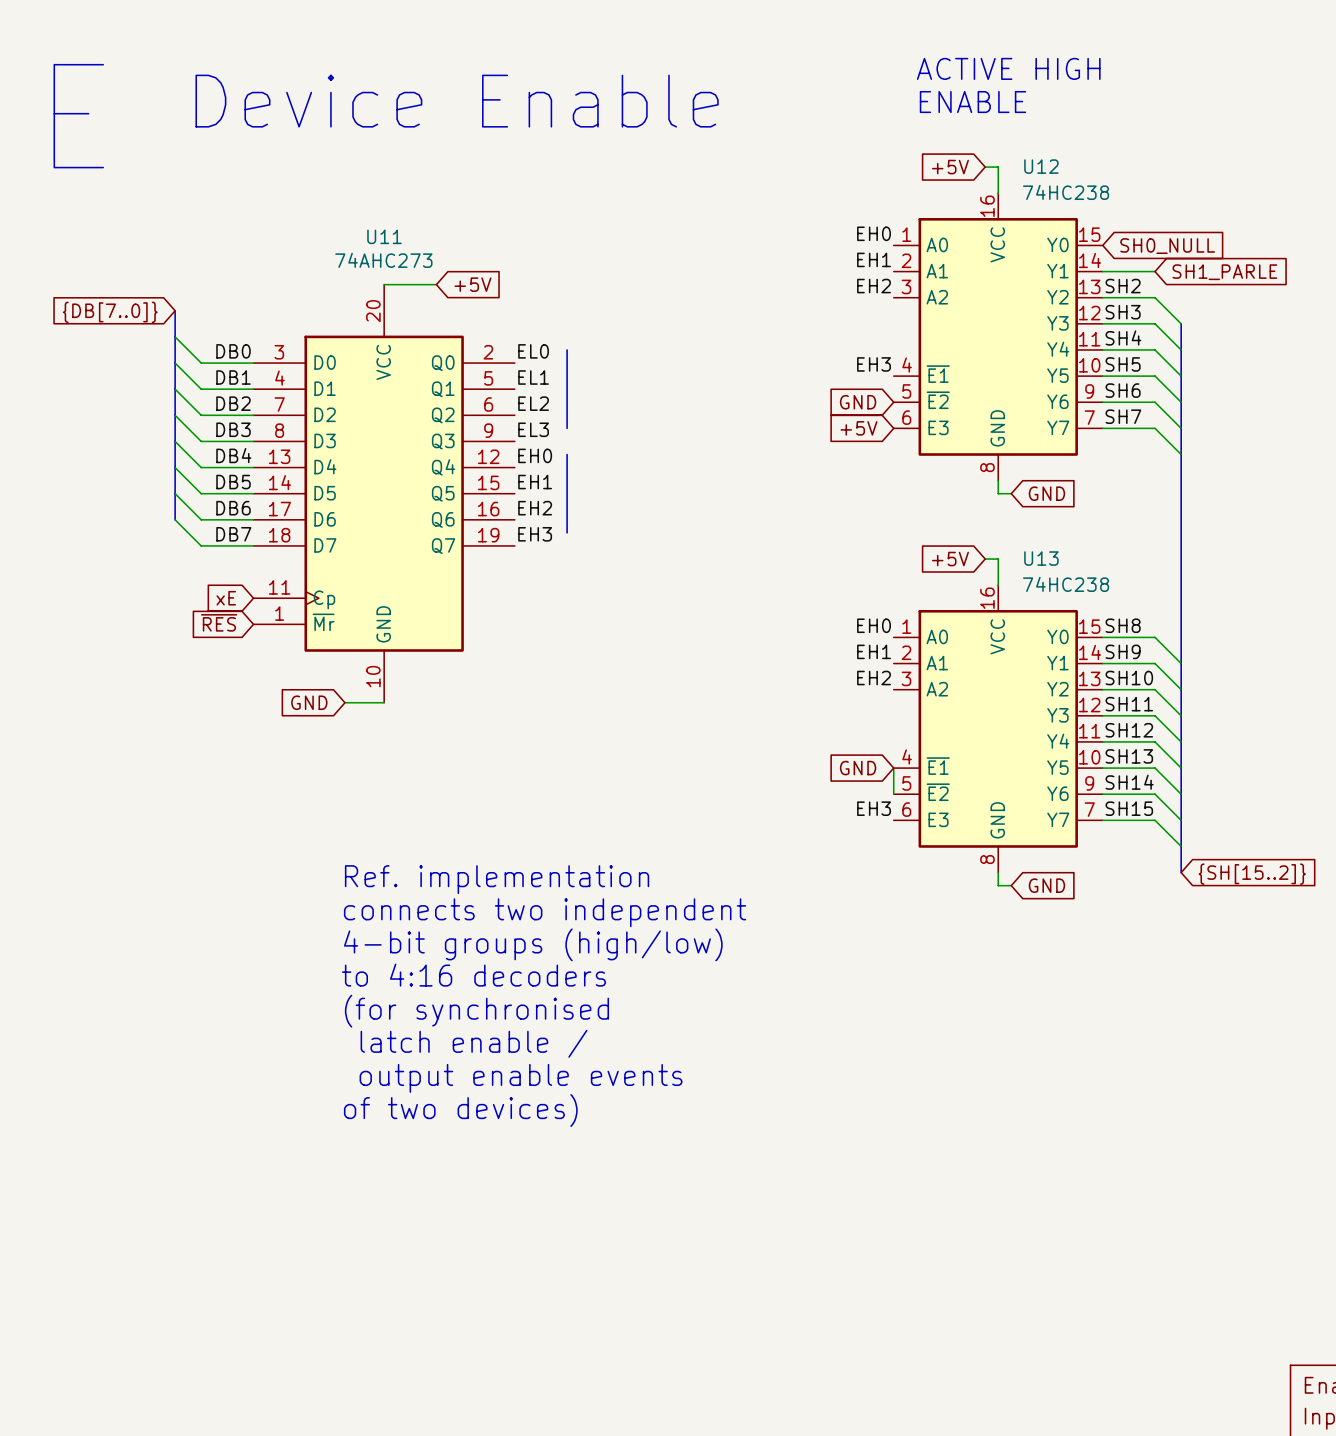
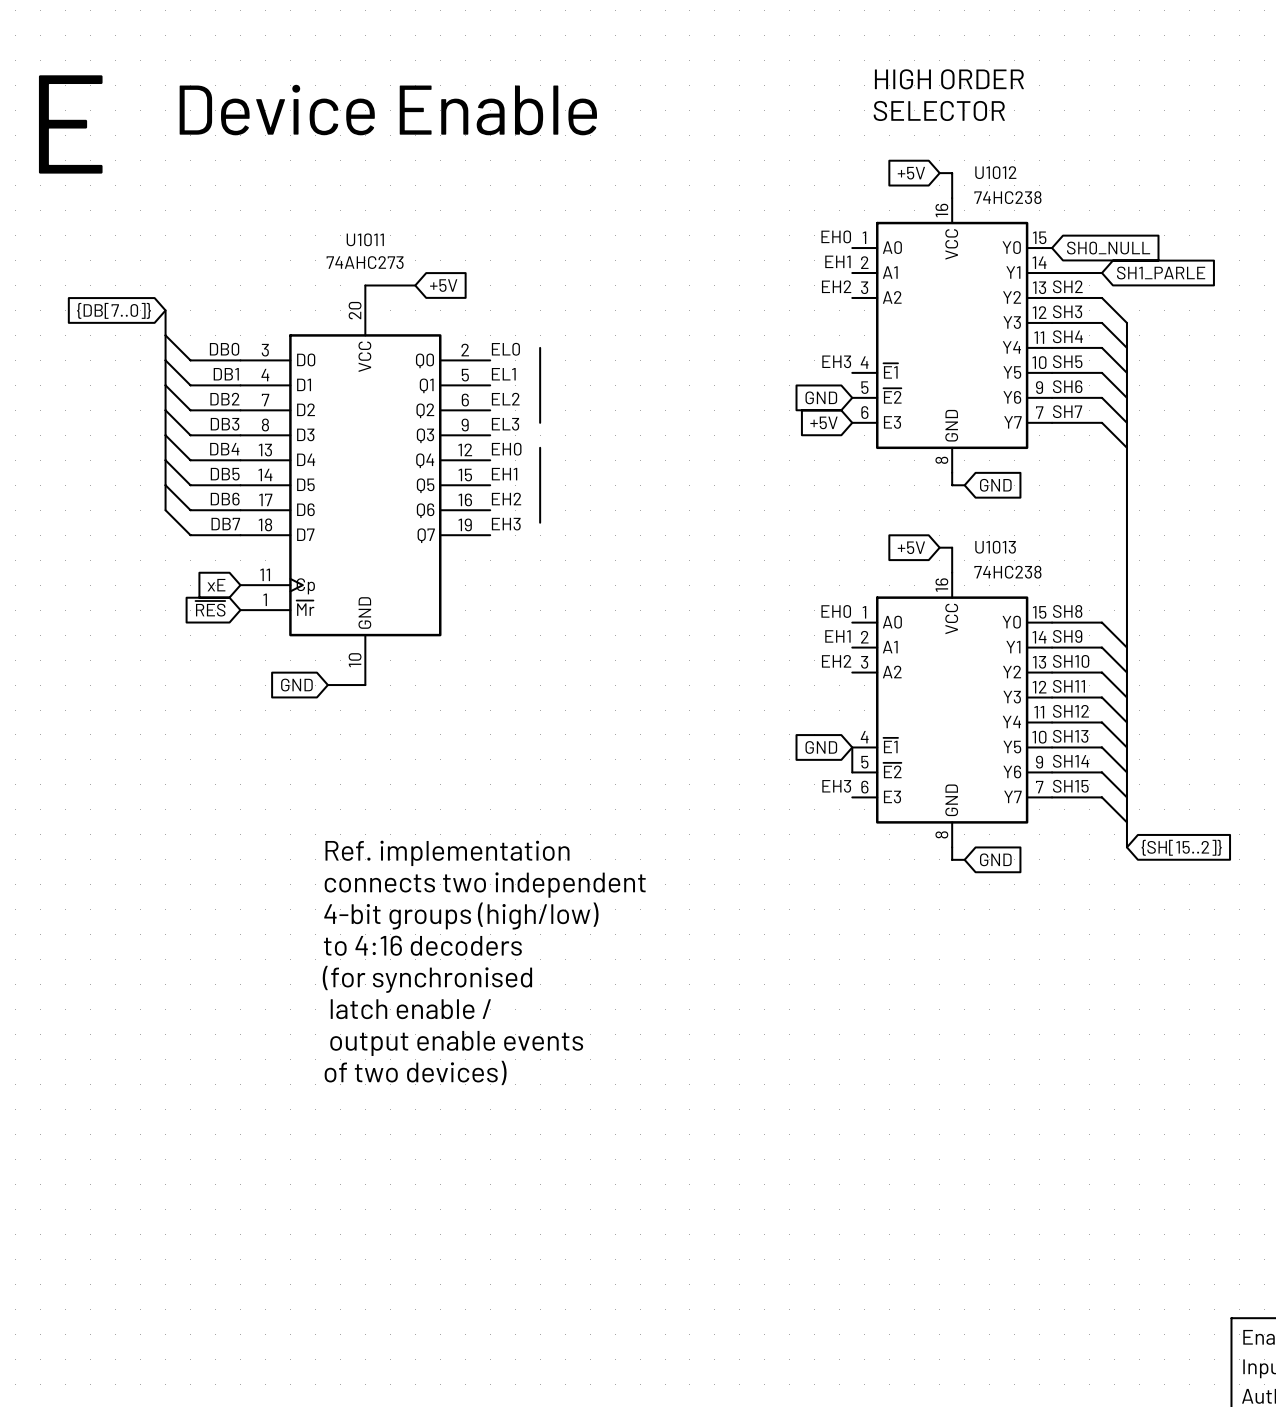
text: ACTIVE HIGH (1008, 68) -> HIGH ORDER (949, 79)
text: ENABLE (972, 102) -> SELECTOR (939, 110)
U12 name: U12 (1041, 166) -> U1012 (995, 172)
U11 name: U11 (384, 236) -> U1011 (365, 239)
U13 name: U13 (1041, 558) -> U1013 (995, 547)

